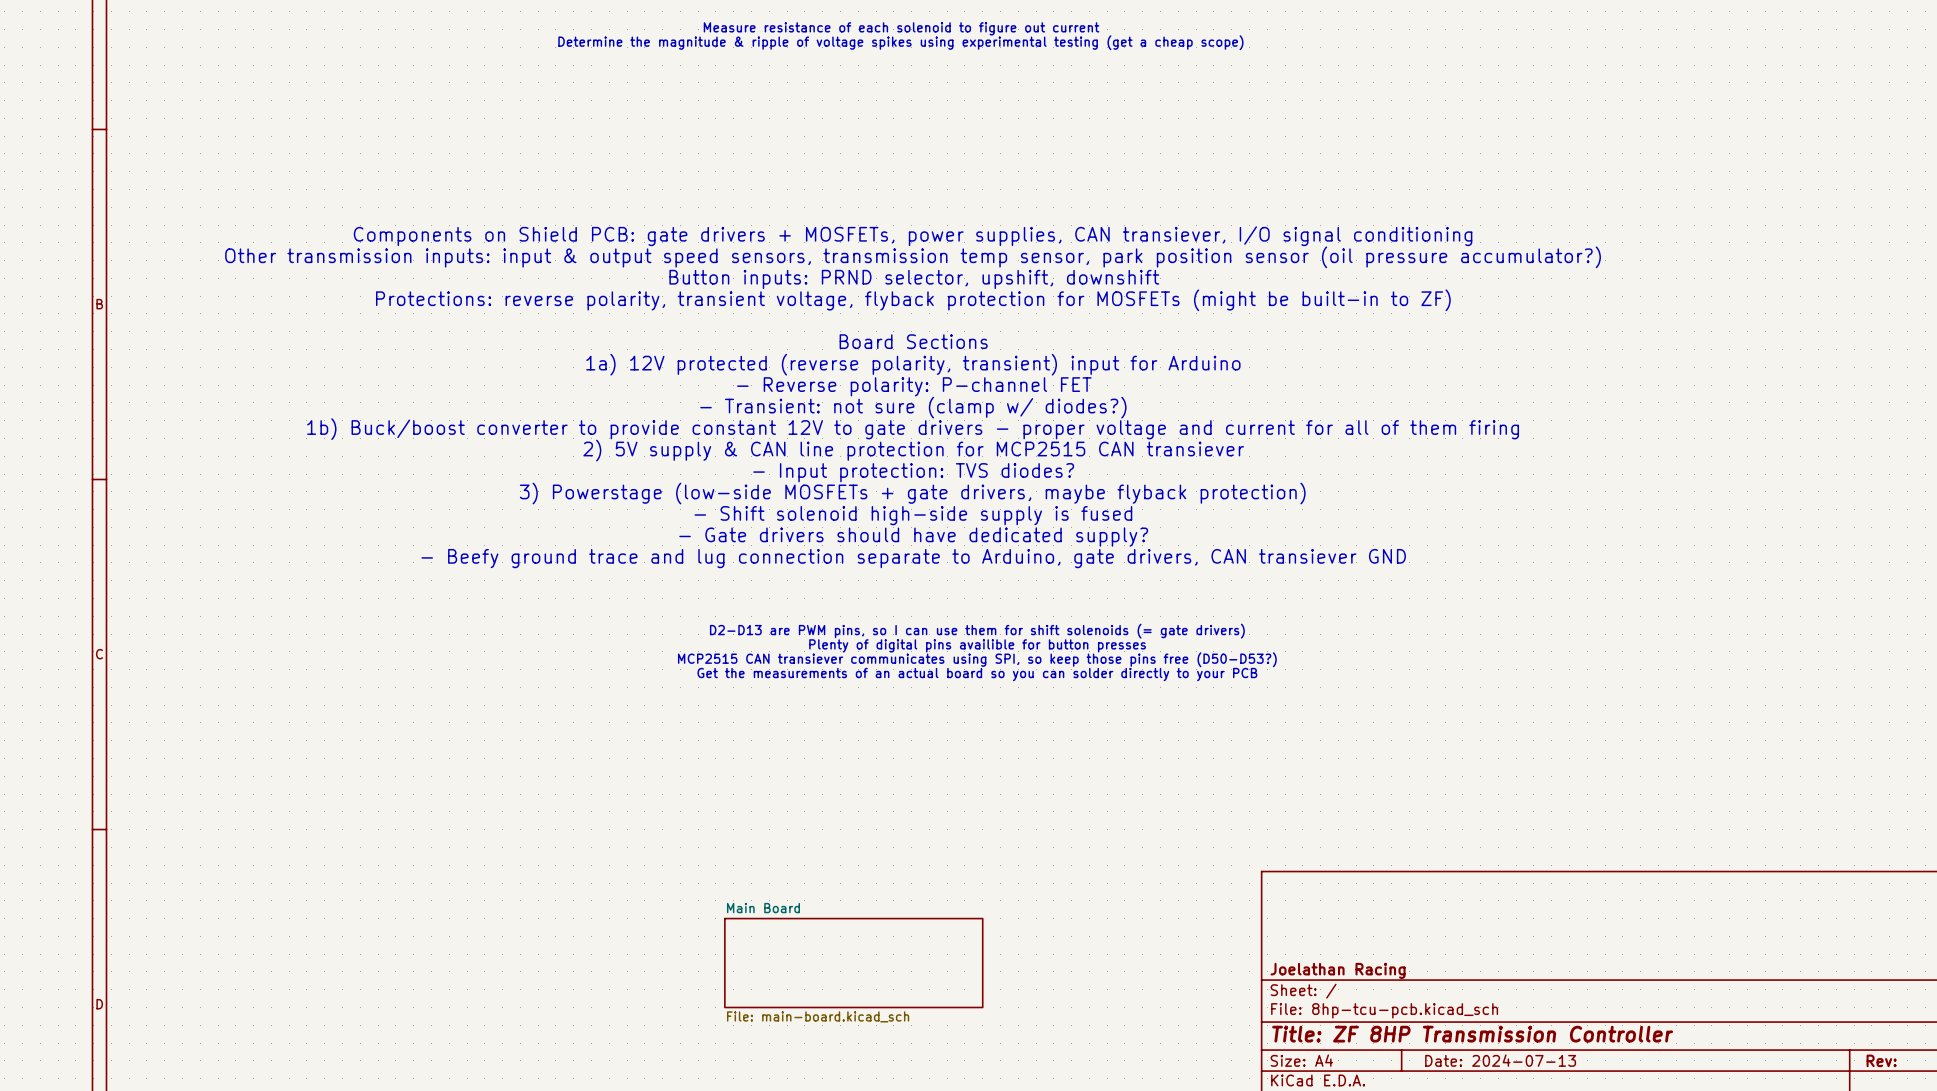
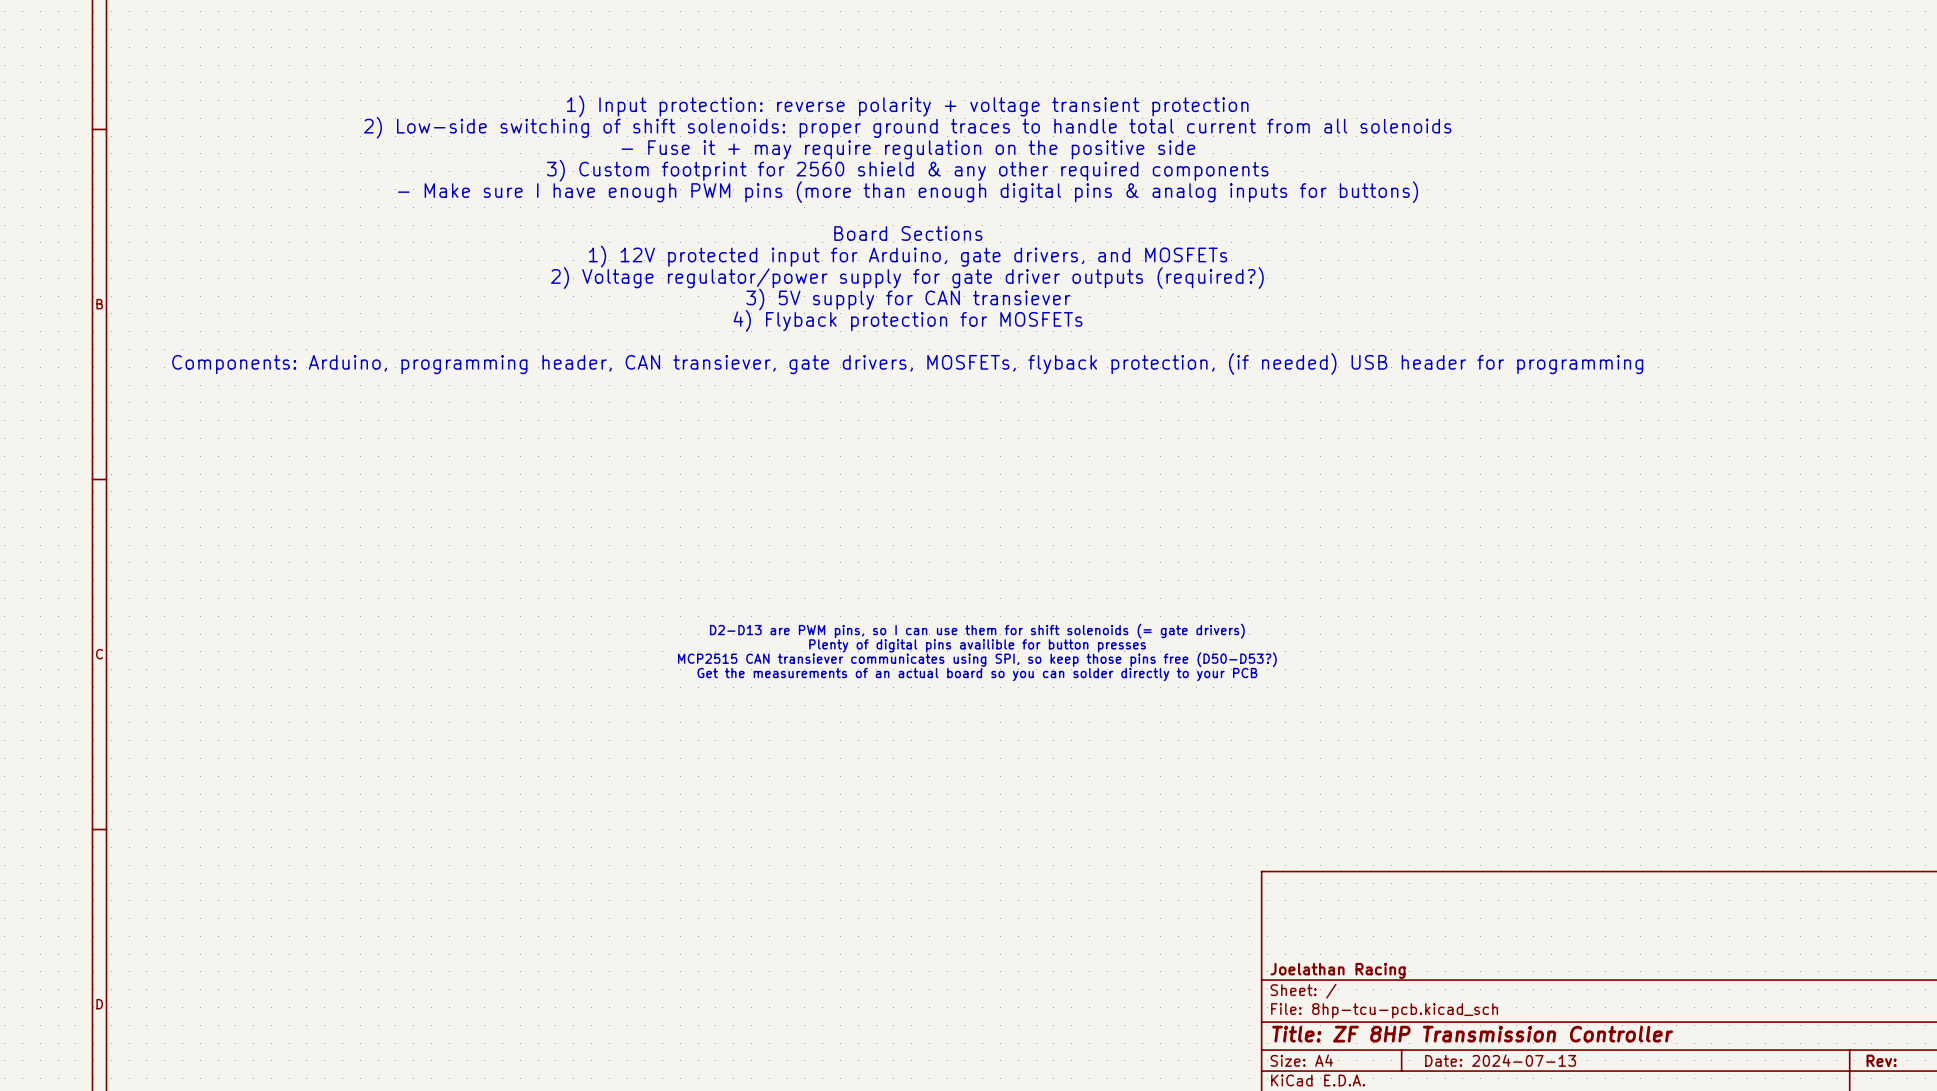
text: Measure resistance of each solenoid to figure out current (901, 28) -> none
text: Determine the magnitude & ripple of voltage spikes using experimental testing (get a cheap scope) (900, 42) -> none
text: none -> 1) Input protection: reverse polarity + voltage transient protection (907, 106)
text: none -> 2) Low-side switching of shift solenoids: proper ground traces to handle total current from all solenoids (907, 127)
text: none -> - Fuse it + may require regulation on the positive side (908, 149)
text: none -> 3) Custom footprint for 2560 shield & any other required components (907, 170)
text: none -> - Make sure I have enough PWM pins (more than enough digital pins & analog inputs for buttons) (908, 192)
text: Components on Shield PCB: gate drivers + MOSFETs, power supplies, CAN transiever, I/O signal conditioning (913, 236) -> none
text: Other transmission inputs: input & output speed sensors, transmission temp sensor, park position sensor (oil pressure accumulator?) (913, 257) -> 1) 12V protected input for Arduino, gate drivers, and MOSFETs (908, 256)
text: Button inputs: PRND selector, upshift, downshift (914, 279) -> 2) Voltage regulator/power supply for gate driver outputs (required?) (907, 278)
text: Protections: reverse polarity, transient voltage, flyback protection for MOSFETs (might be built-in to ZF) (913, 300) -> 3) 5V supply for CAN transiever (908, 299)
text: none -> 4) Flyback protection for MOSFETs (908, 320)
text position: Board Sections (913, 341) -> Board Sections (908, 233)
text: 1a) 12V protected (reverse polarity, transient) input for Arduino (913, 364) -> Components: Arduino, programming header, CAN transiever, gate drivers, MOSFETs, flyback protection, (if needed) USB header for programming (907, 363)
text: - Reverse polarity: P-channel FET (914, 386) -> none
text: - Transient: not sure (clamp w/ diodes?) (913, 407) -> none
text: 1b) Buck/boost converter to provide constant 12V to gate drivers - proper voltage and current for all of them firing (913, 429) -> none
text: 2) 5V supply & CAN line protection for MCP2515 CAN transiever (913, 450) -> none
text: - Input protection: TVS diodes? (913, 472) -> none
text: 3) Powerstage (low-side MOSFETs + gate drivers, maybe flyback protection) (912, 493) -> none
text: - Shift solenoid high-side supply is fused (913, 515) -> none
text: - Gate drivers should have dedicated supply? (913, 537) -> none
text: - Beefy ground trace and lug connection separate to Arduino, gate drivers, CAN transiever GND (913, 558) -> none
sheet Main Board: File: main-board.kicad_sch (853, 963) -> none

